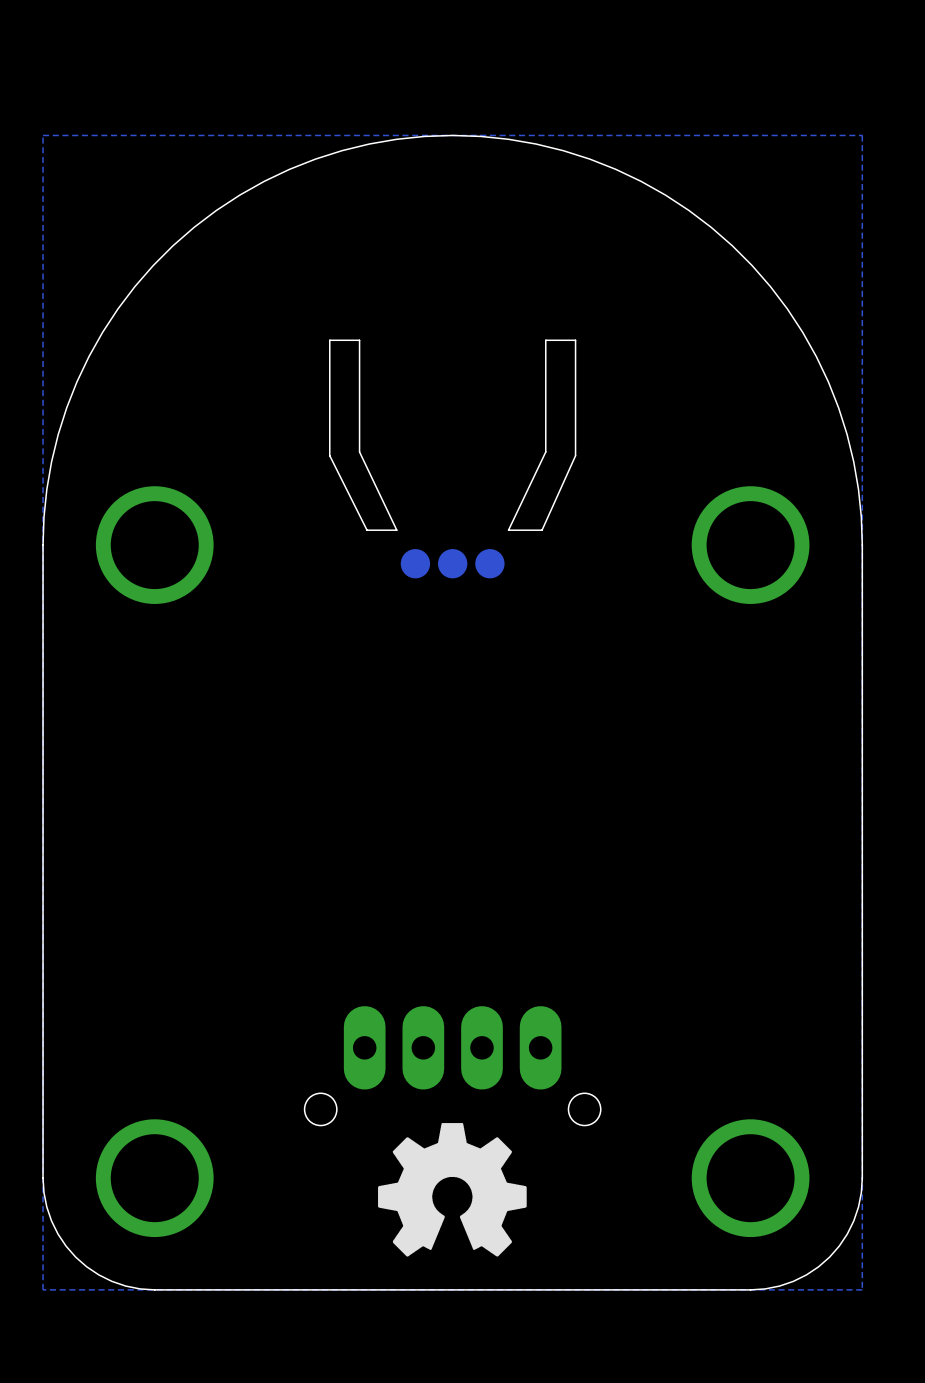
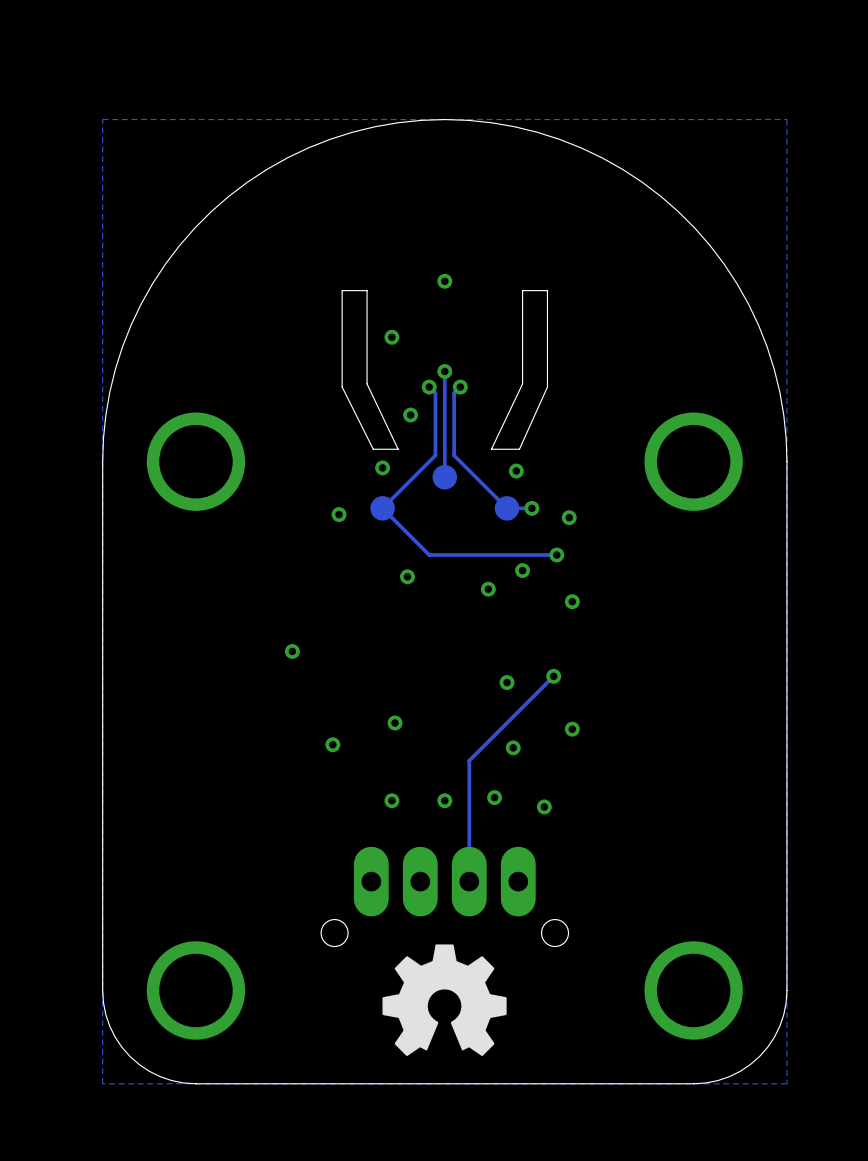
via: none -> (444, 281)
via: none -> (391, 337)
track: none -> (444, 371) (444, 477)
via: none -> (444, 371)
track: none -> (429, 387) (435, 393) (435, 455) (382, 508) (429, 555) (556, 555)
via: none -> (429, 387)
track: none -> (460, 387) (454, 393) (454, 455) (507, 508) (531, 508)
via: none -> (460, 387)
via: none -> (410, 415)
via: none -> (382, 467)
via: none -> (516, 471)
part position: (415, 563) -> (382, 508)
part position: (489, 563) -> (507, 508)
via: none -> (531, 508)
via: none -> (339, 514)
via: none -> (569, 517)
via: none -> (556, 555)
via: none -> (522, 570)
via: none -> (407, 576)
via: none -> (488, 589)
via: none -> (572, 601)
via: none -> (292, 651)
track: none -> (553, 676) (469, 760) (469, 881)
via: none -> (553, 676)
via: none -> (507, 682)
via: none -> (395, 722)
via: none -> (572, 729)
via: none -> (332, 744)
via: none -> (513, 747)
via: none -> (494, 797)
via: none -> (391, 800)
via: none -> (444, 800)
via: none -> (544, 806)

